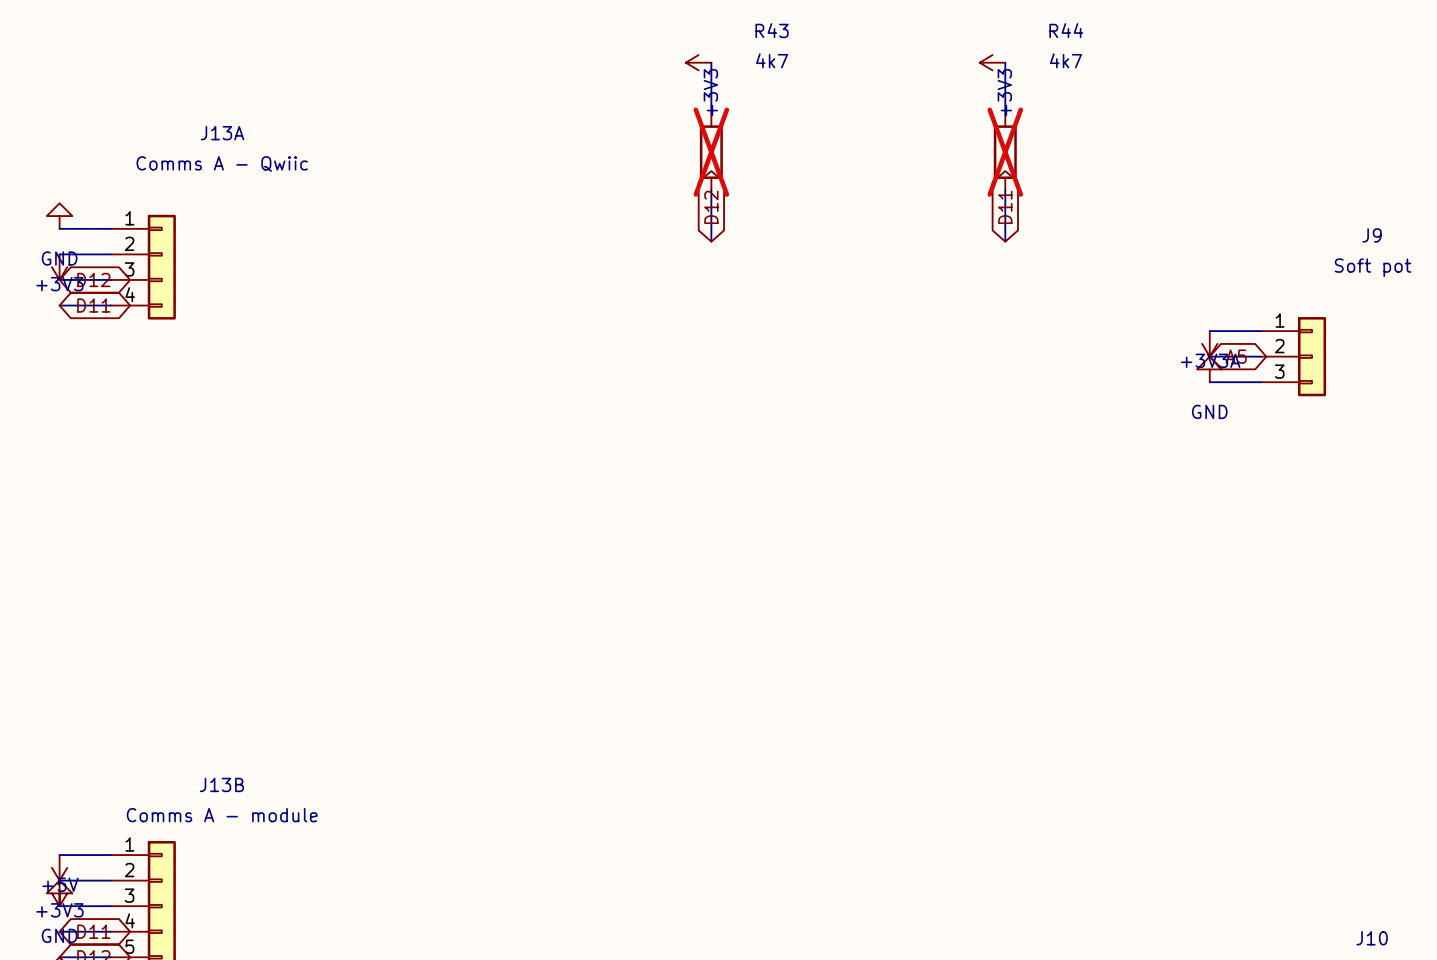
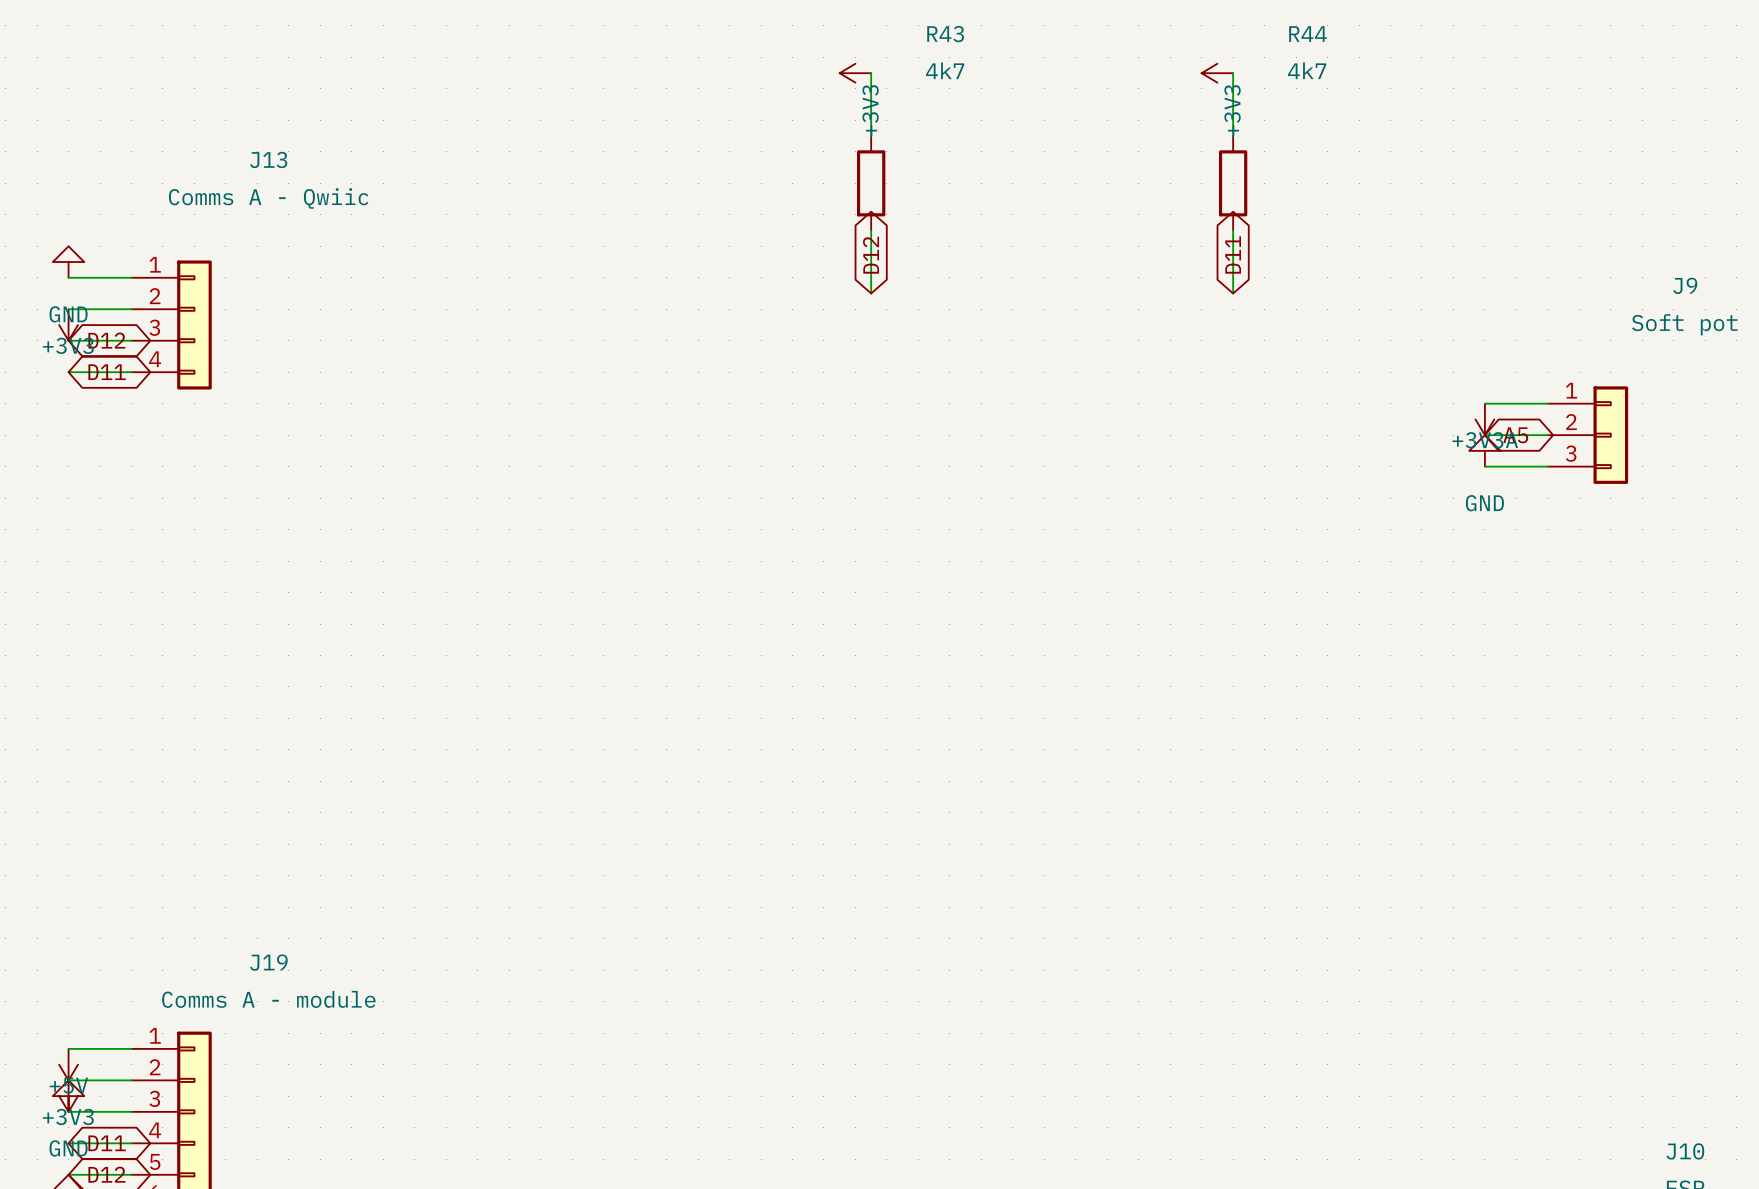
J13A name: J13A (222, 133) -> J13 (268, 159)
R43 do-not-place cross: (711, 152) -> none
R44 do-not-place cross: (1005, 152) -> none
J13B name: J13B (221, 784) -> J19 (268, 962)

